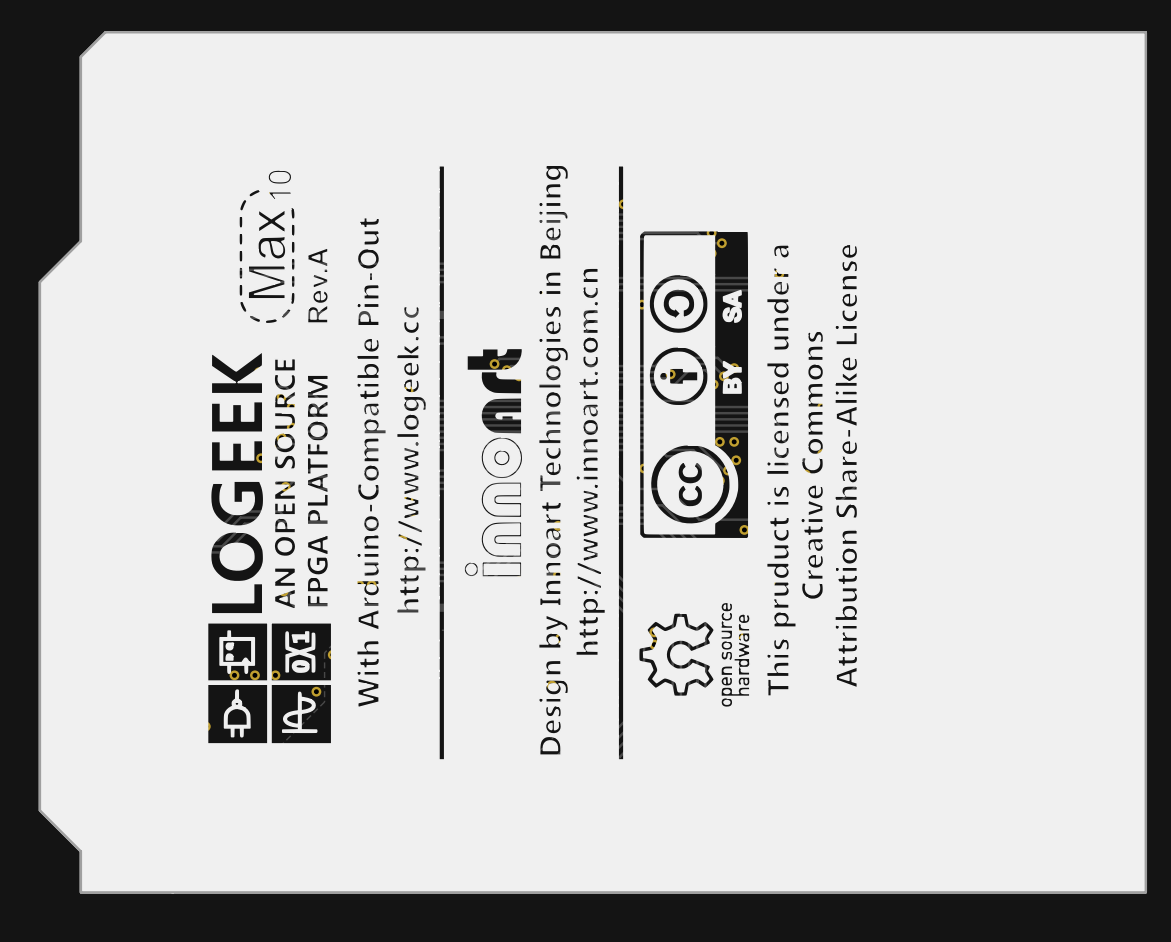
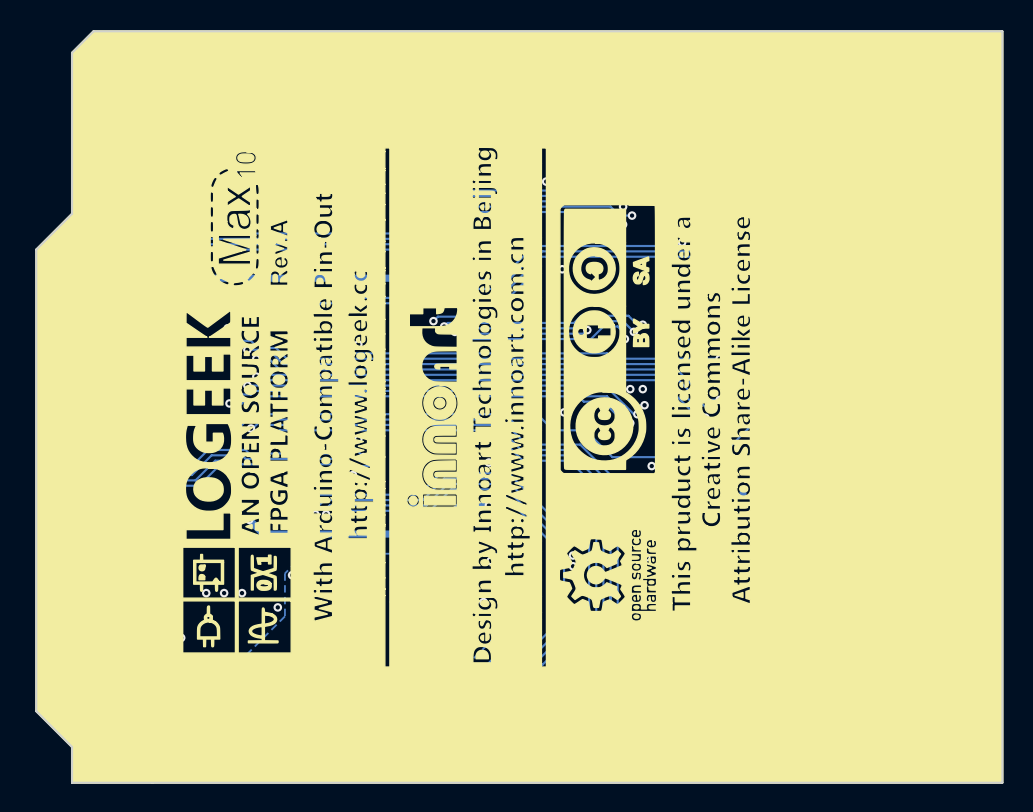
track: none -> (742, 492) (742, 494)

